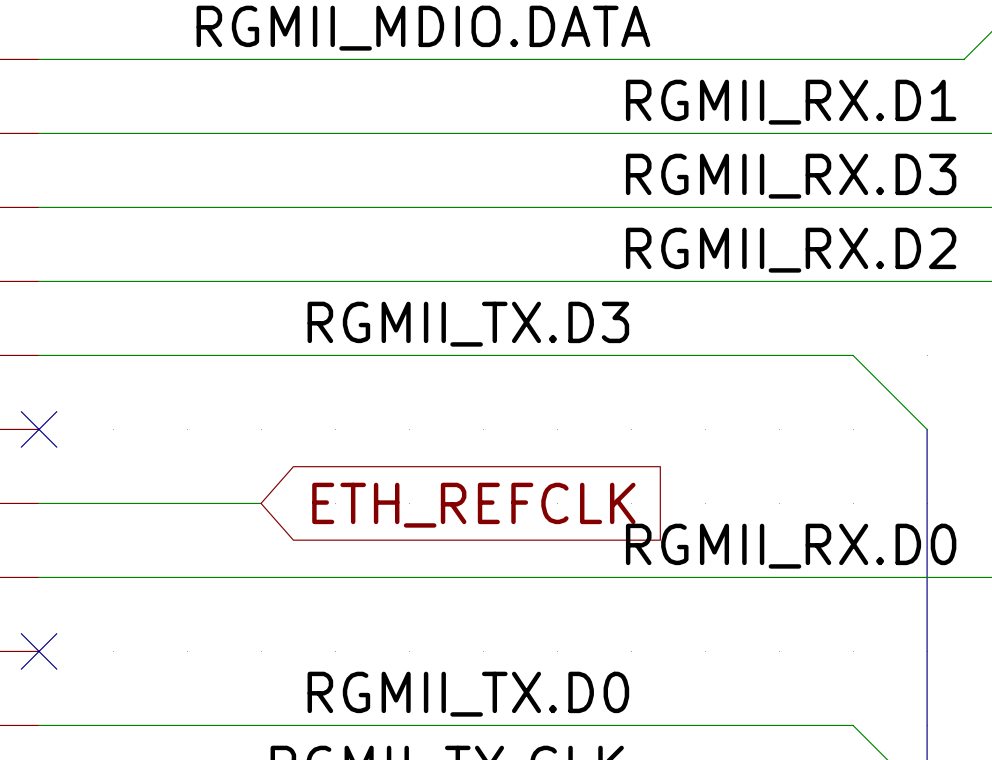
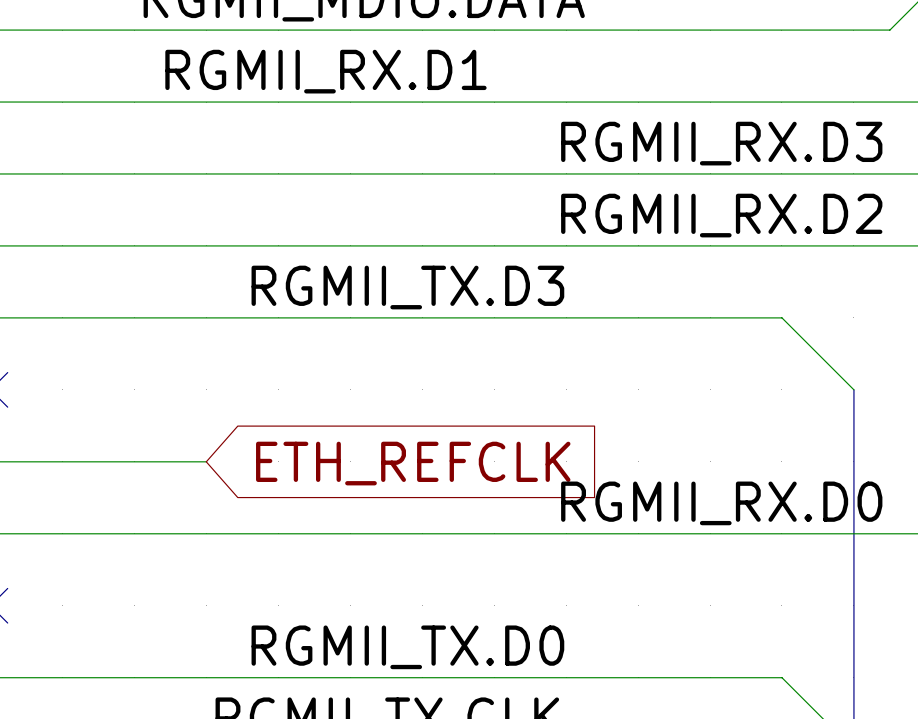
label position: RGMII_RX.D1 (791, 102) -> RGMII_RX.D1 (325, 71)

